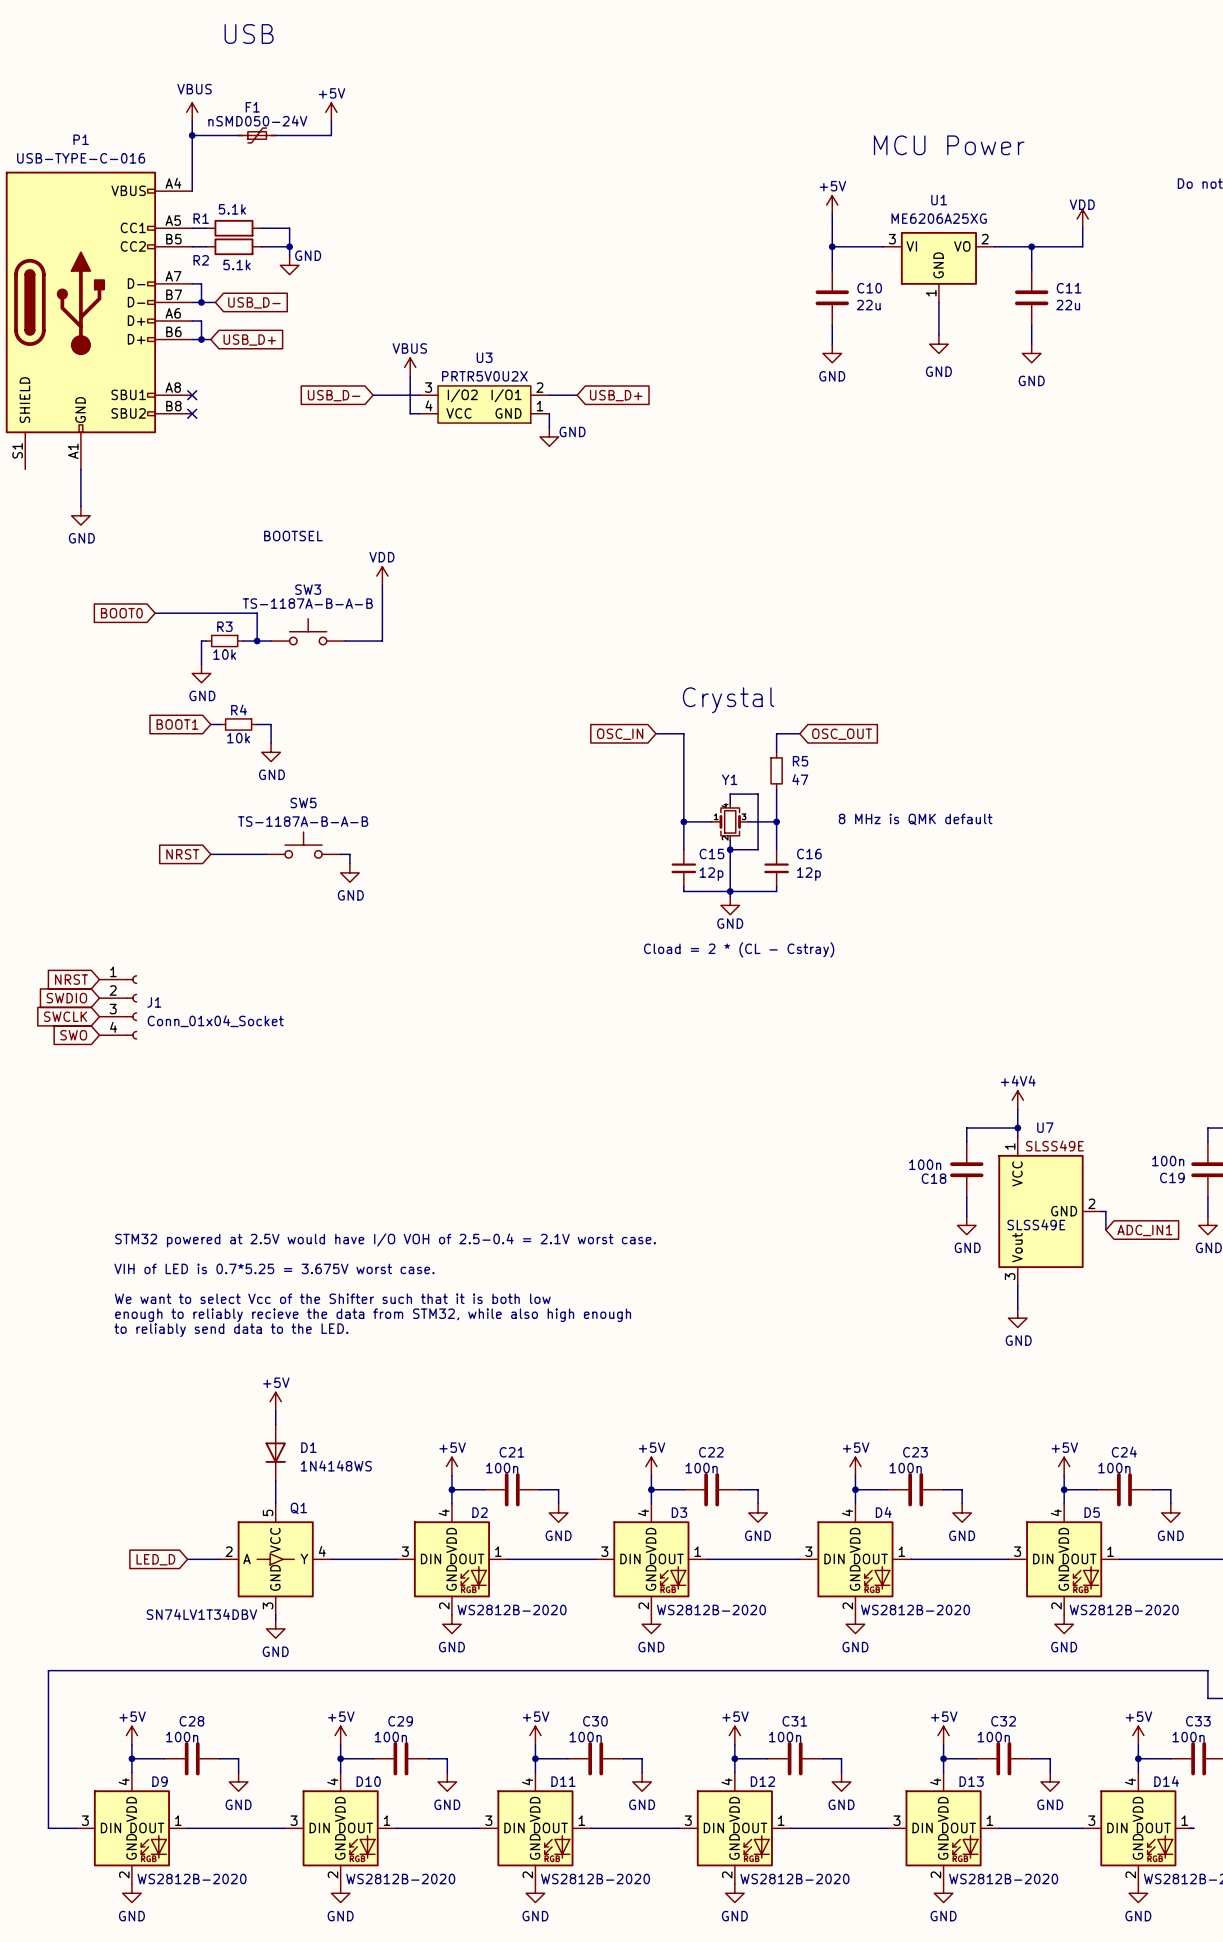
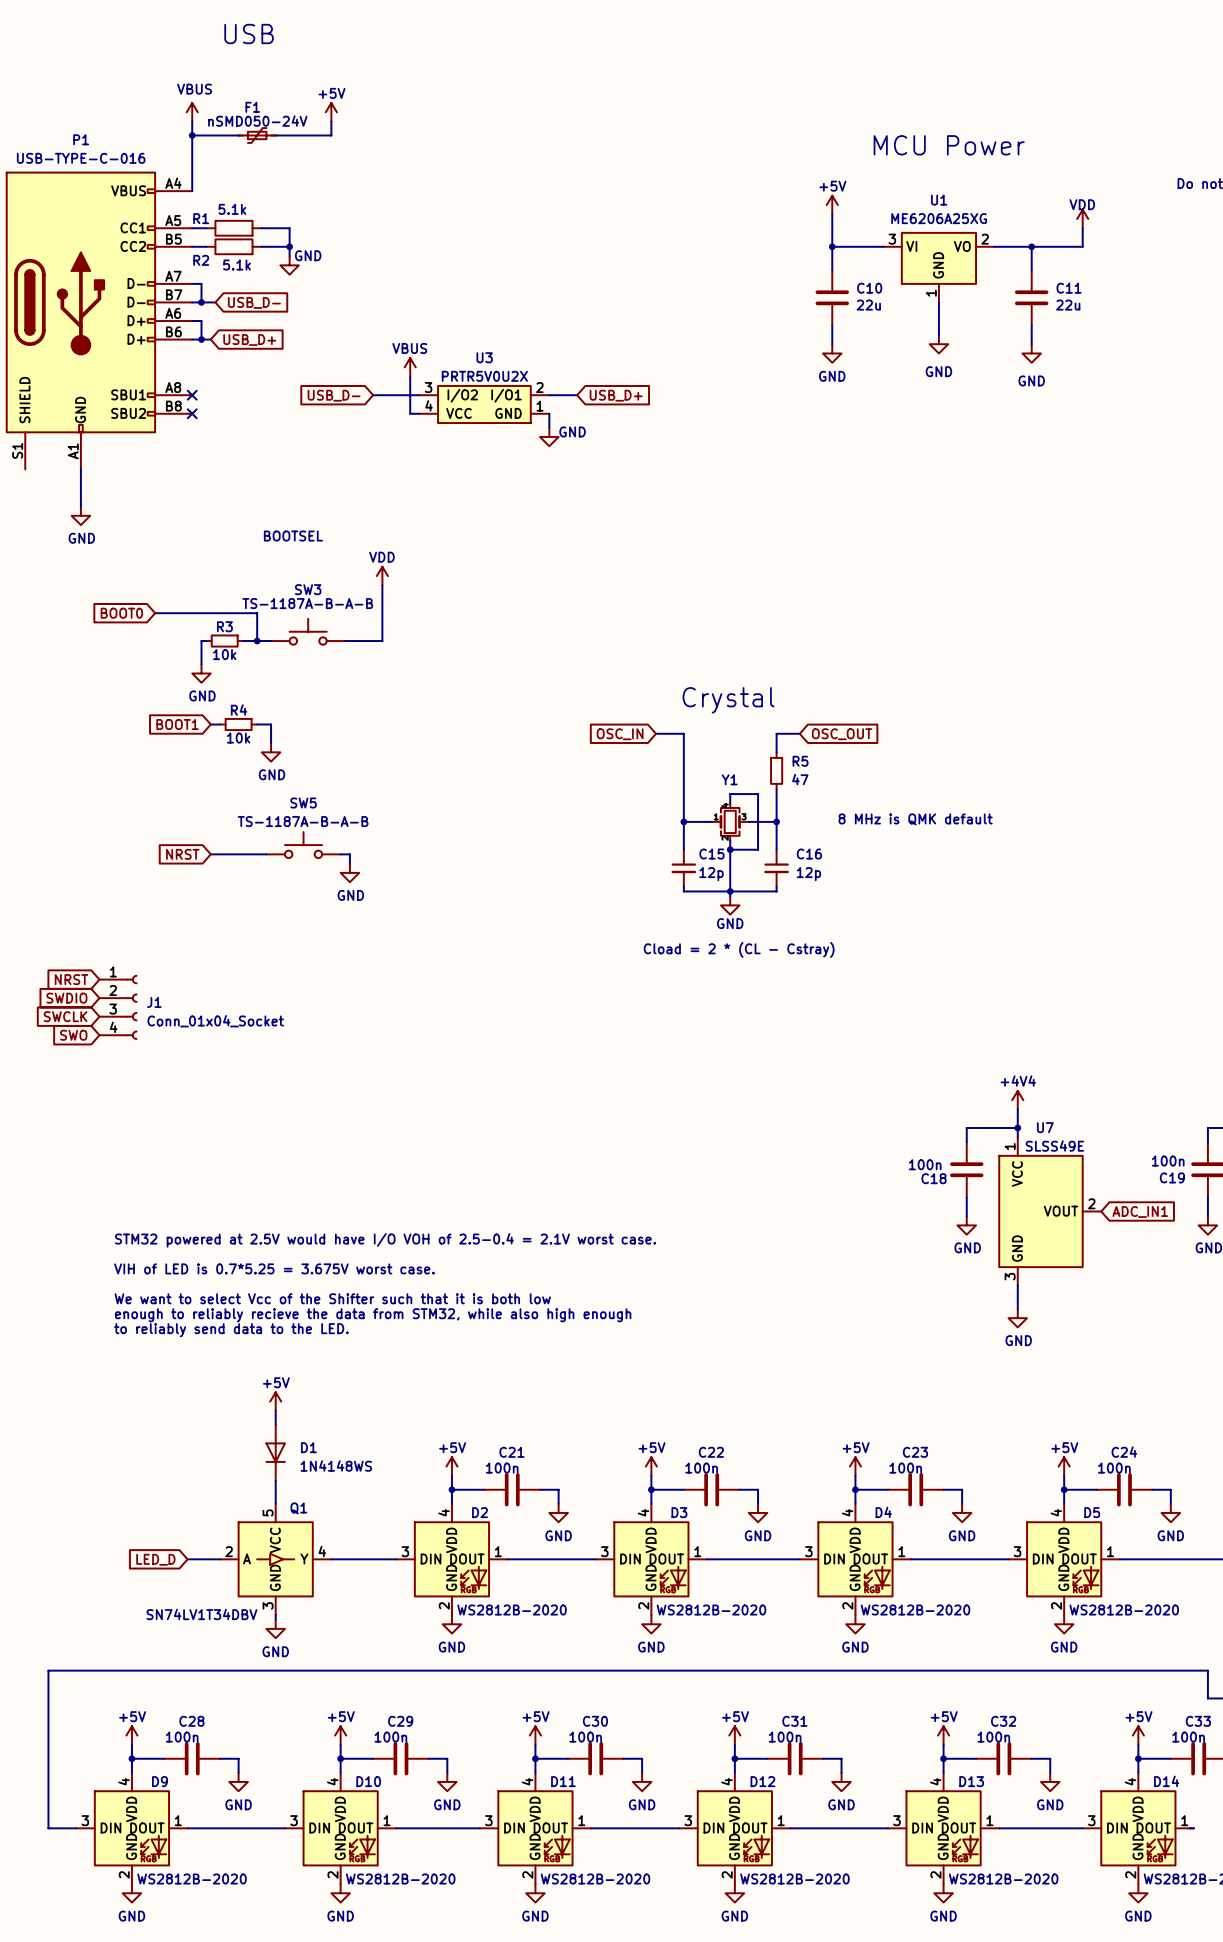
U7 text: SLSS49E (1054, 1145) -> none
U7 pin name: GND (1064, 1211) -> VOUT (1061, 1211)
wire: (1101, 1211) (1105, 1211) (1105, 1230) -> none
U7 value position: SLSS49E (1036, 1224) -> SLSS49E (1054, 1145)
global label position: ADC_IN1 (1144, 1230) -> ADC_IN1 (1140, 1211)
U7 pin name: Vout (1017, 1247) -> GND (1017, 1248)

